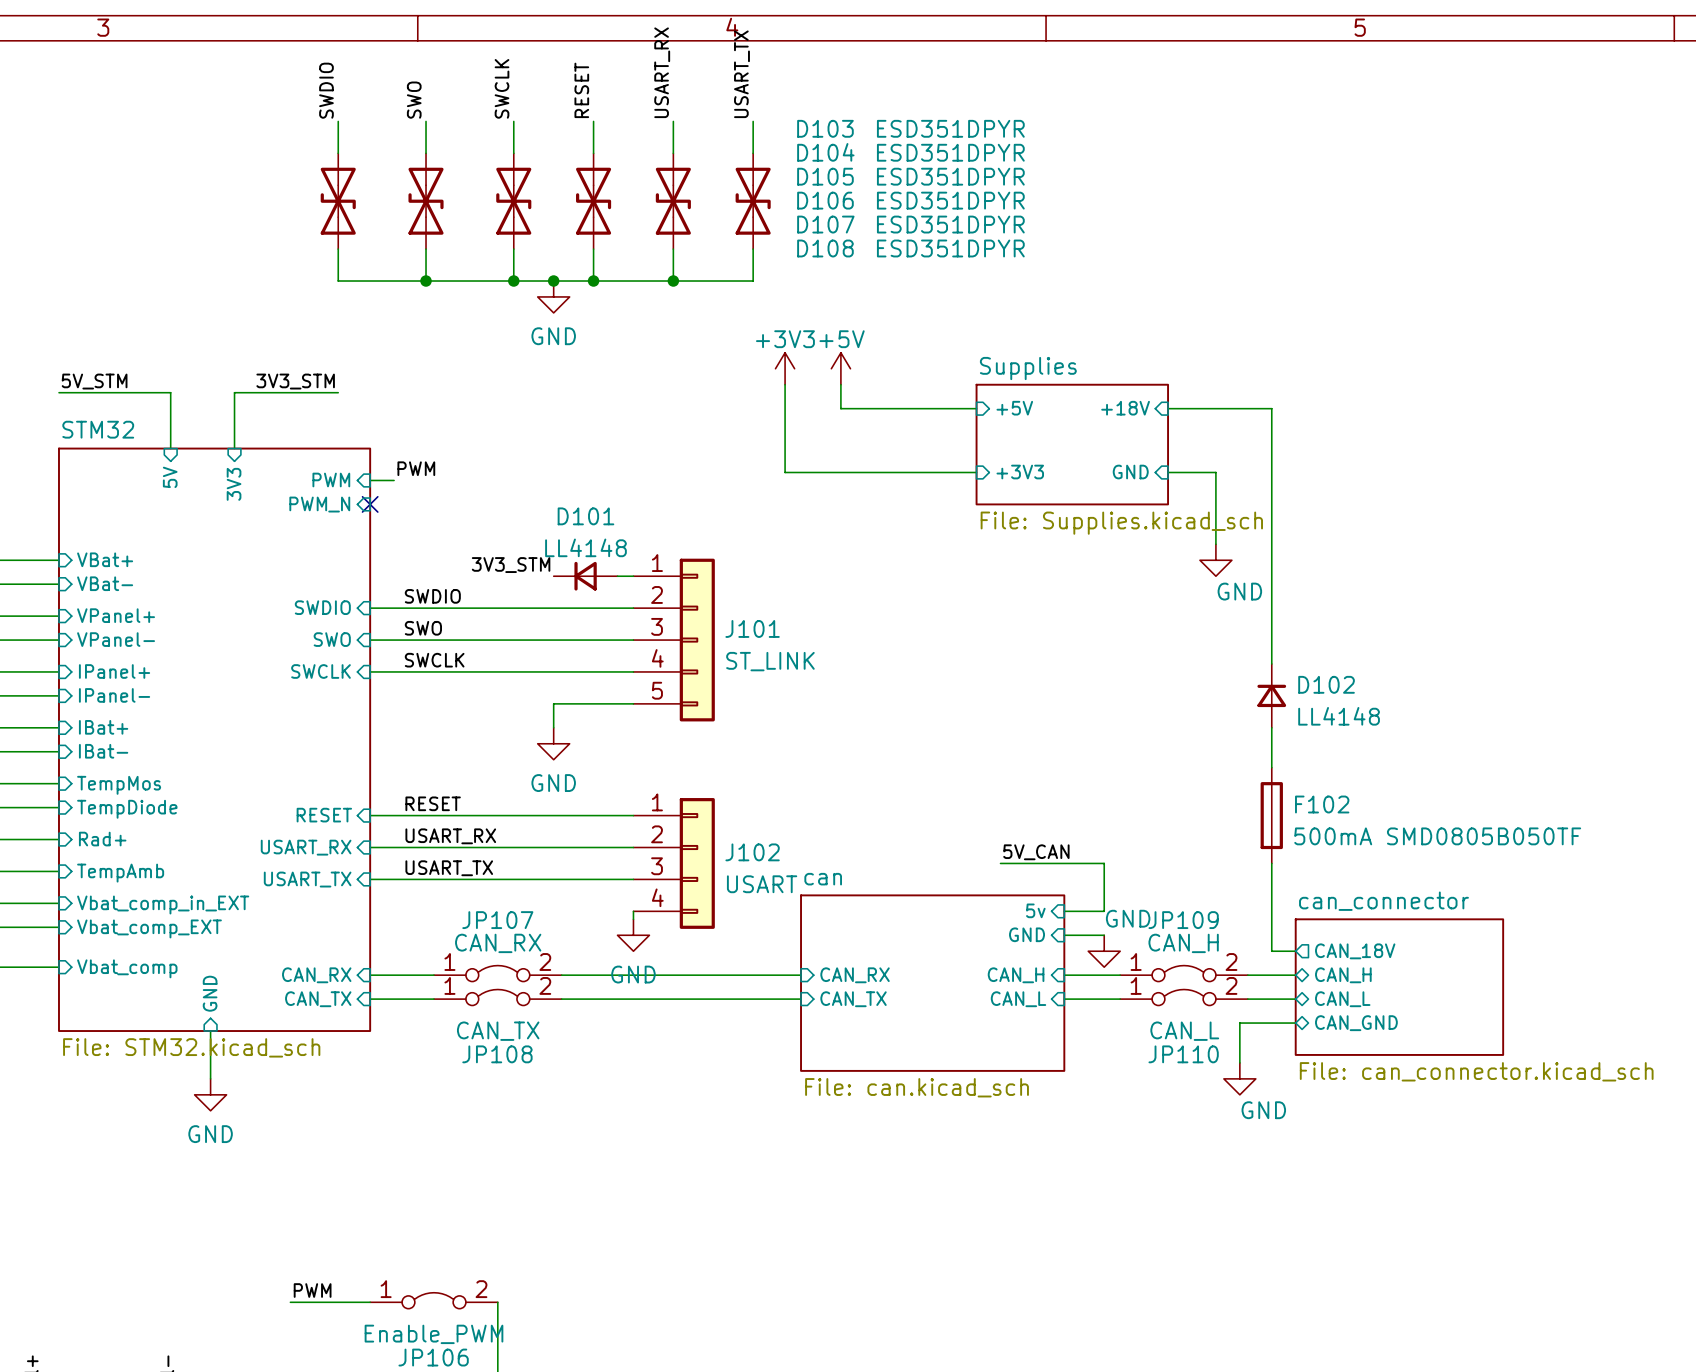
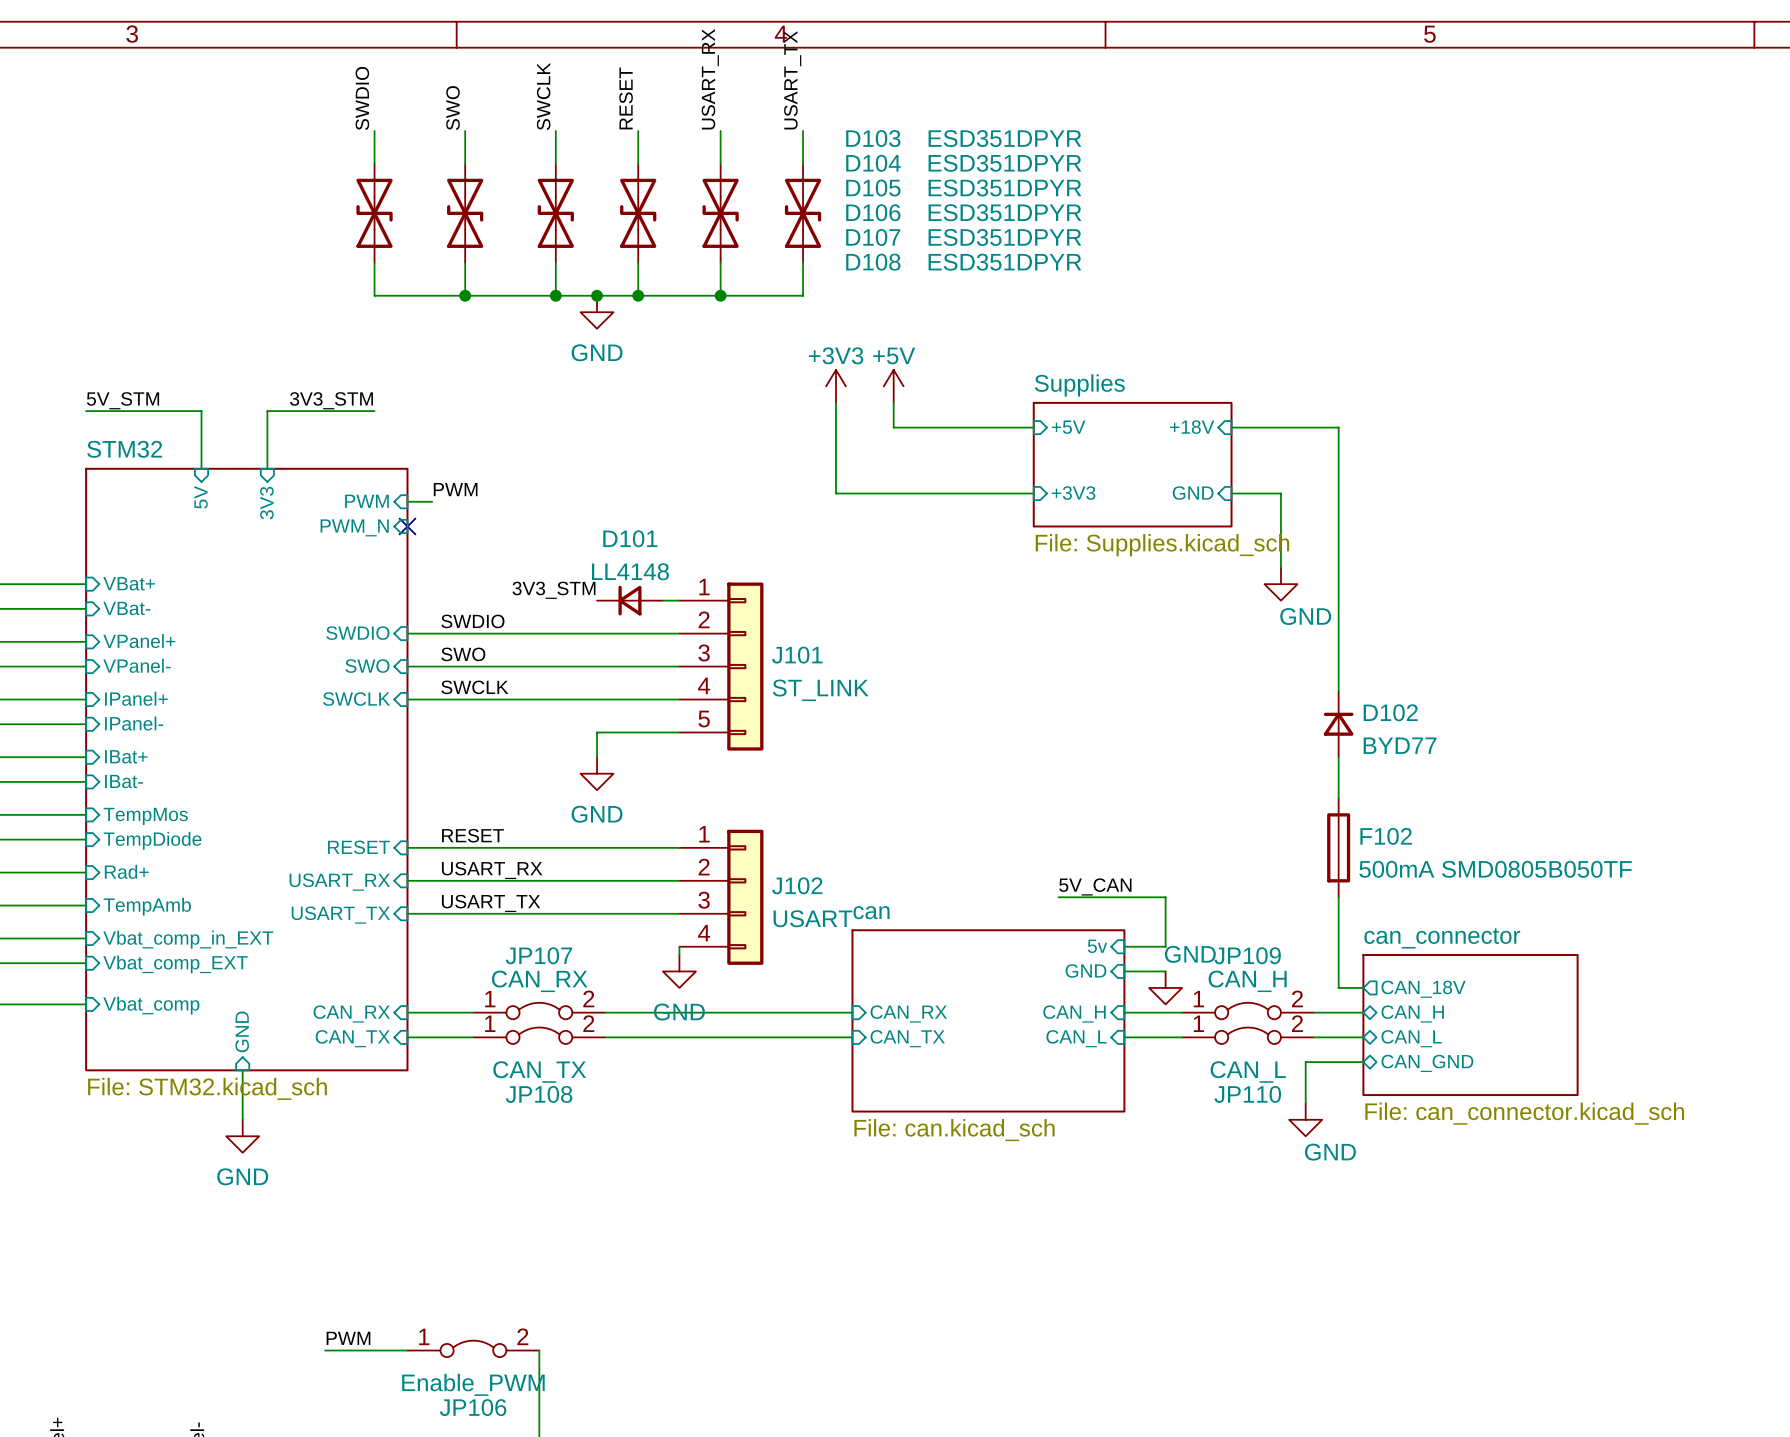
D102 value: LL4148 (1339, 716) -> BYD77 (1400, 745)

